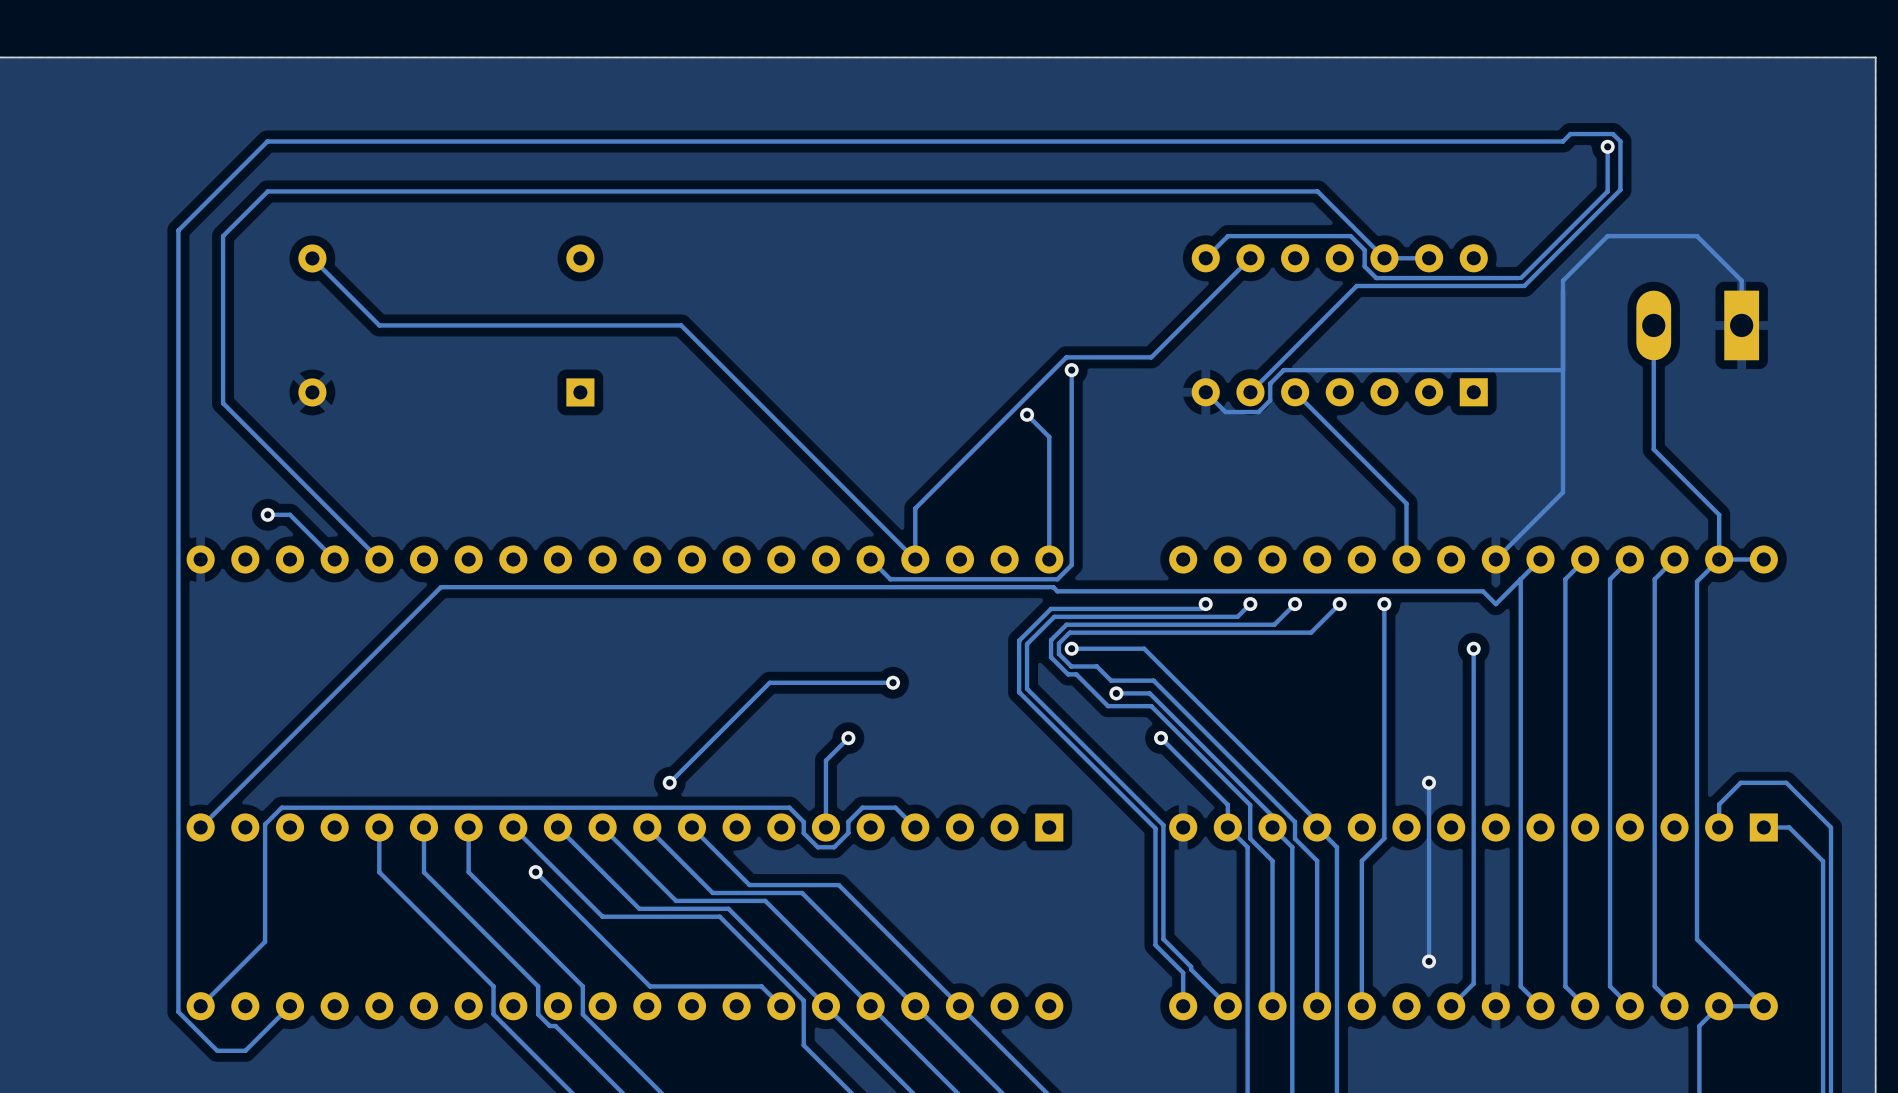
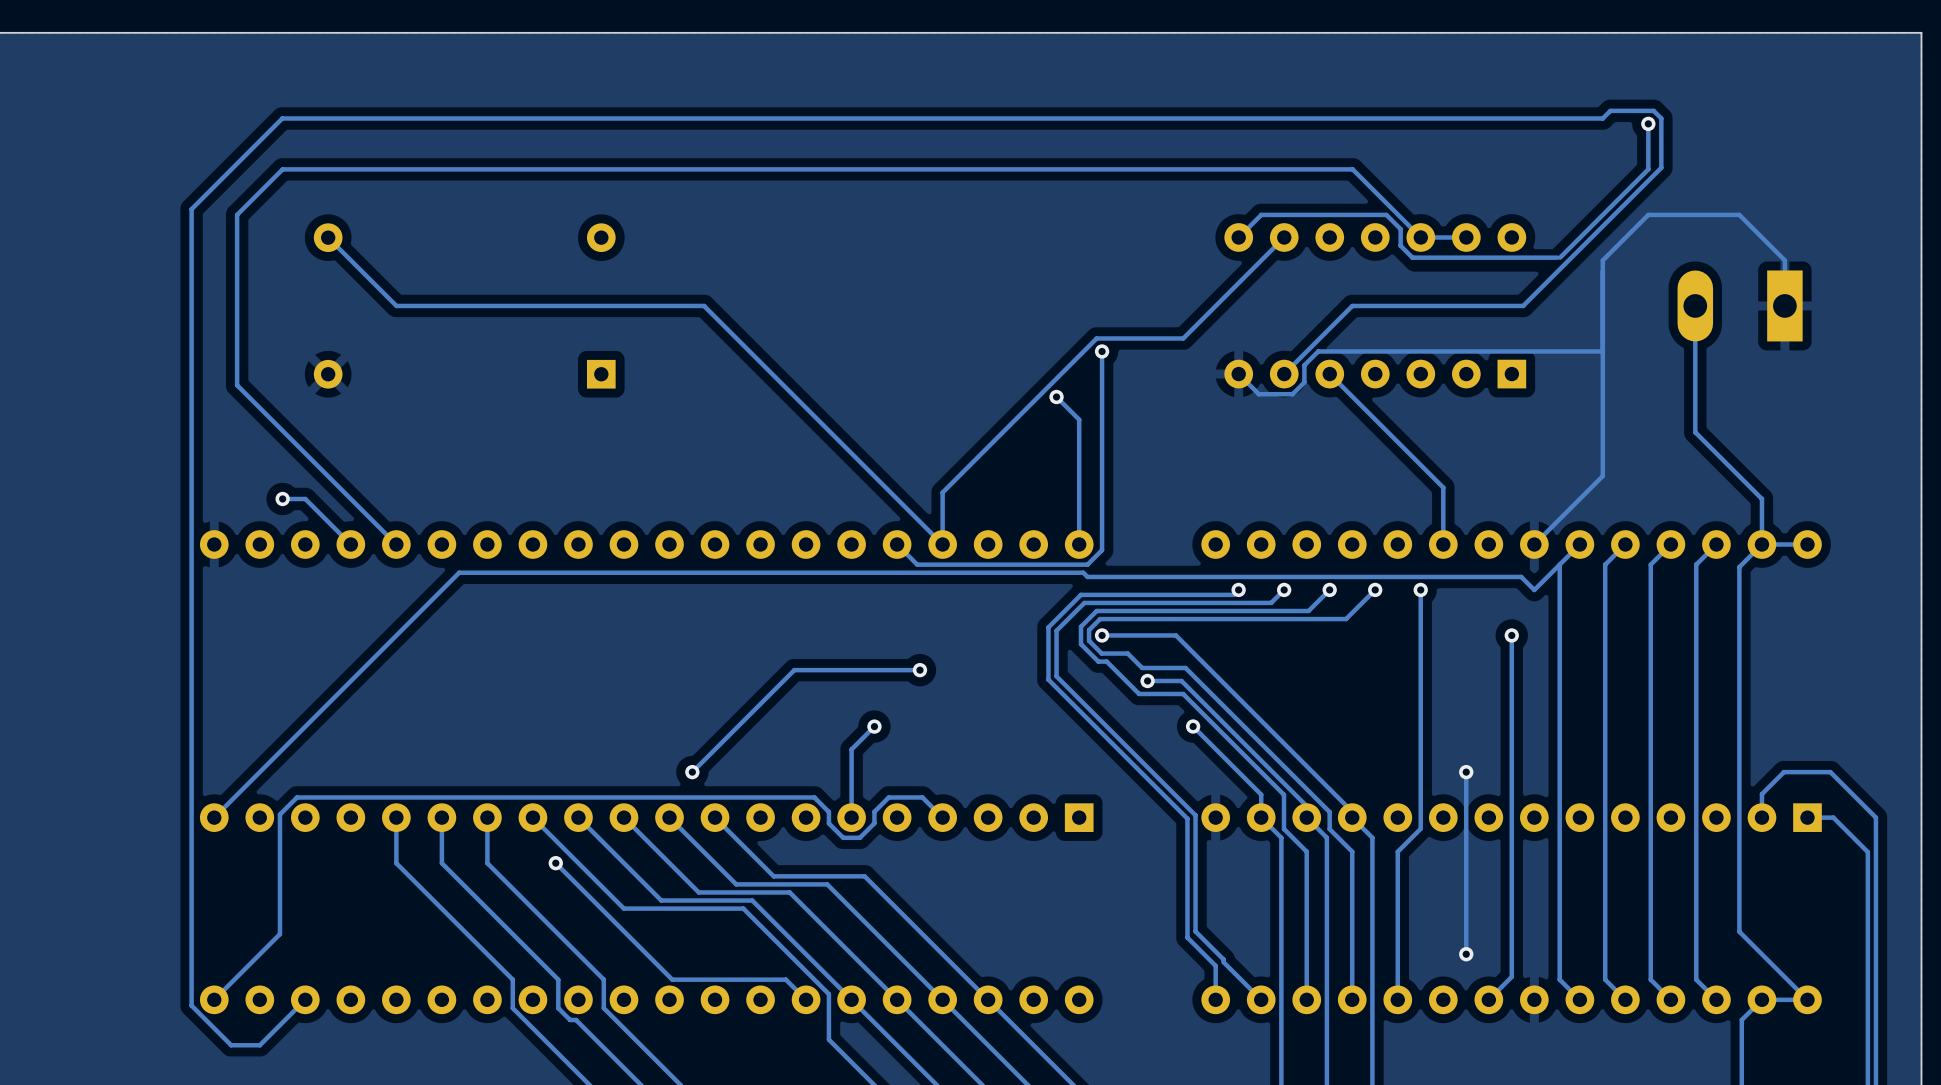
track: (1524, 285) (1356, 285) (1317, 325) -> (1563, 265) (1523, 305) (1352, 305)

